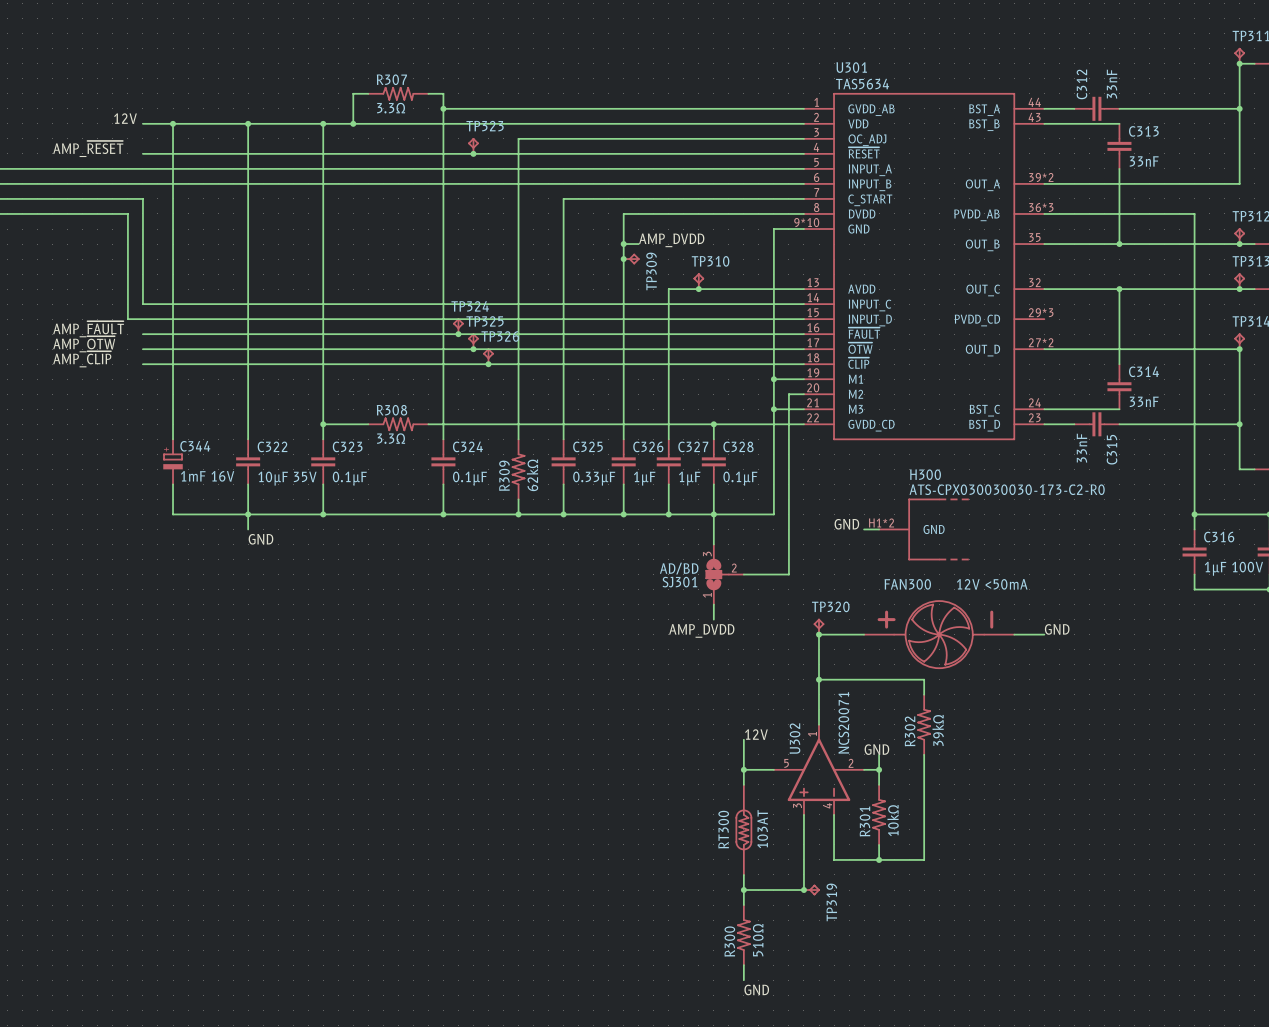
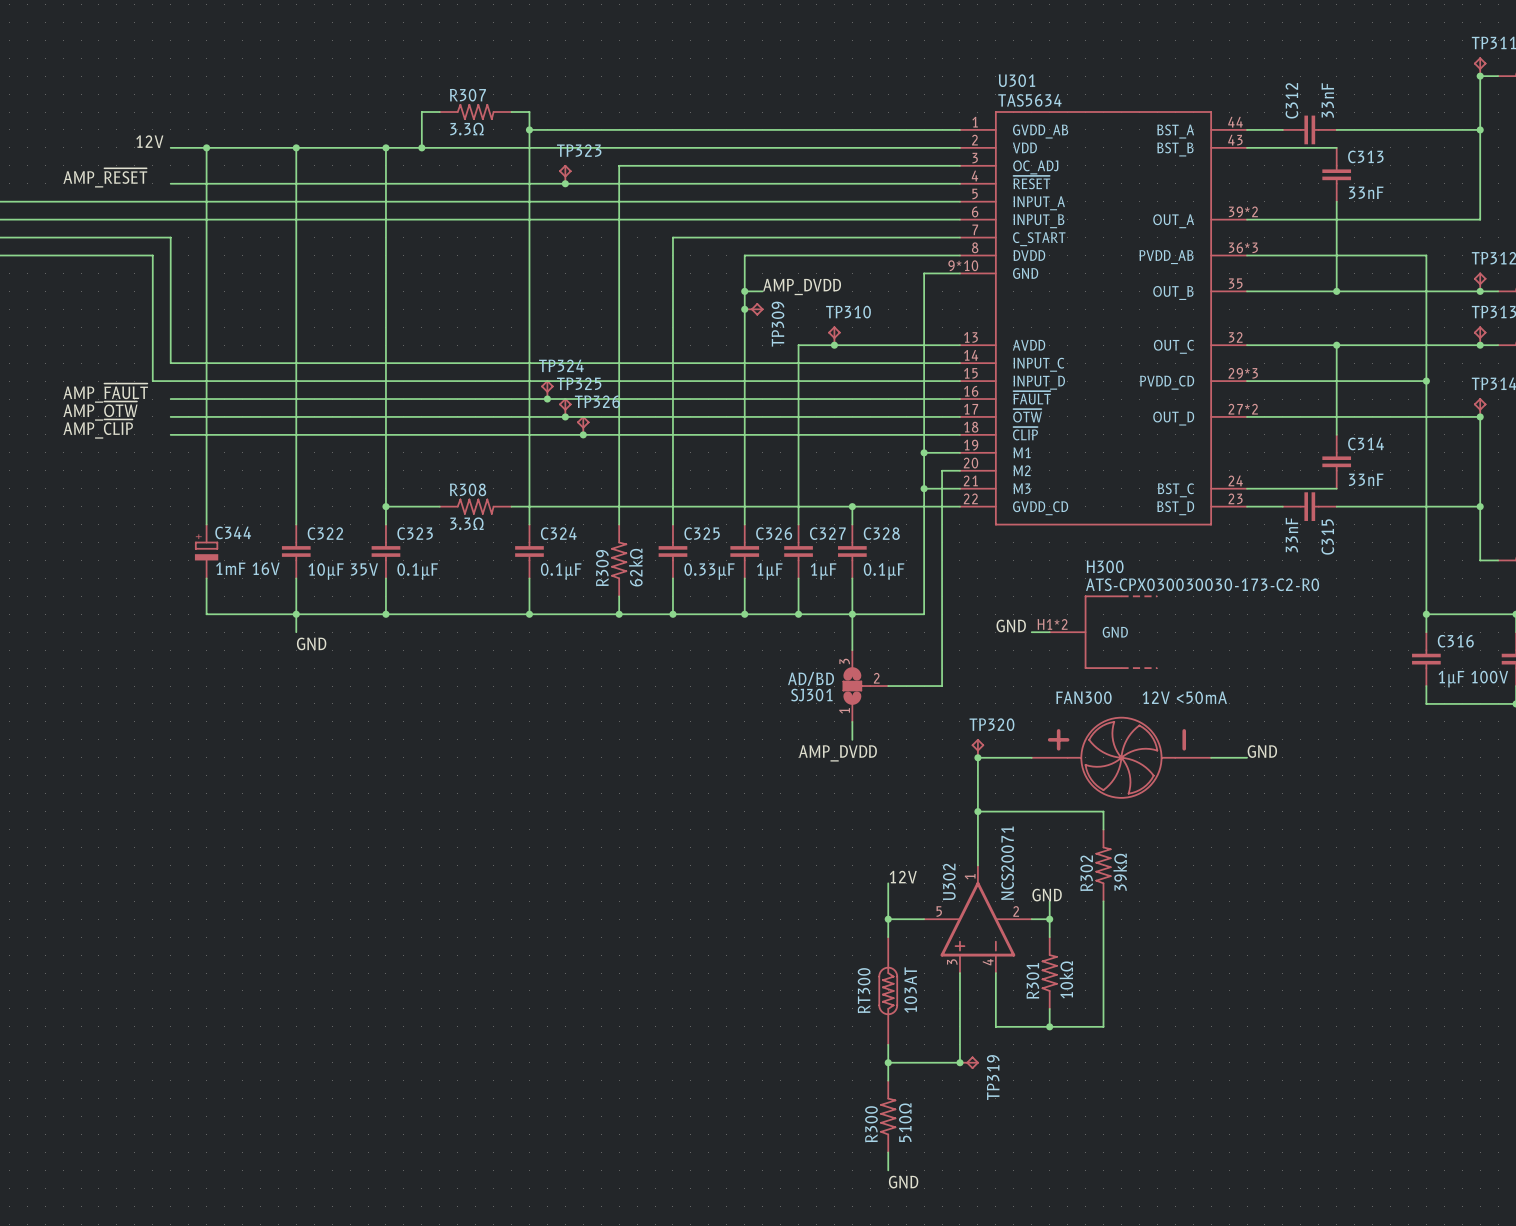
wire: none -> (1247, 381) (1426, 381)
junction: none -> (1426, 381)

